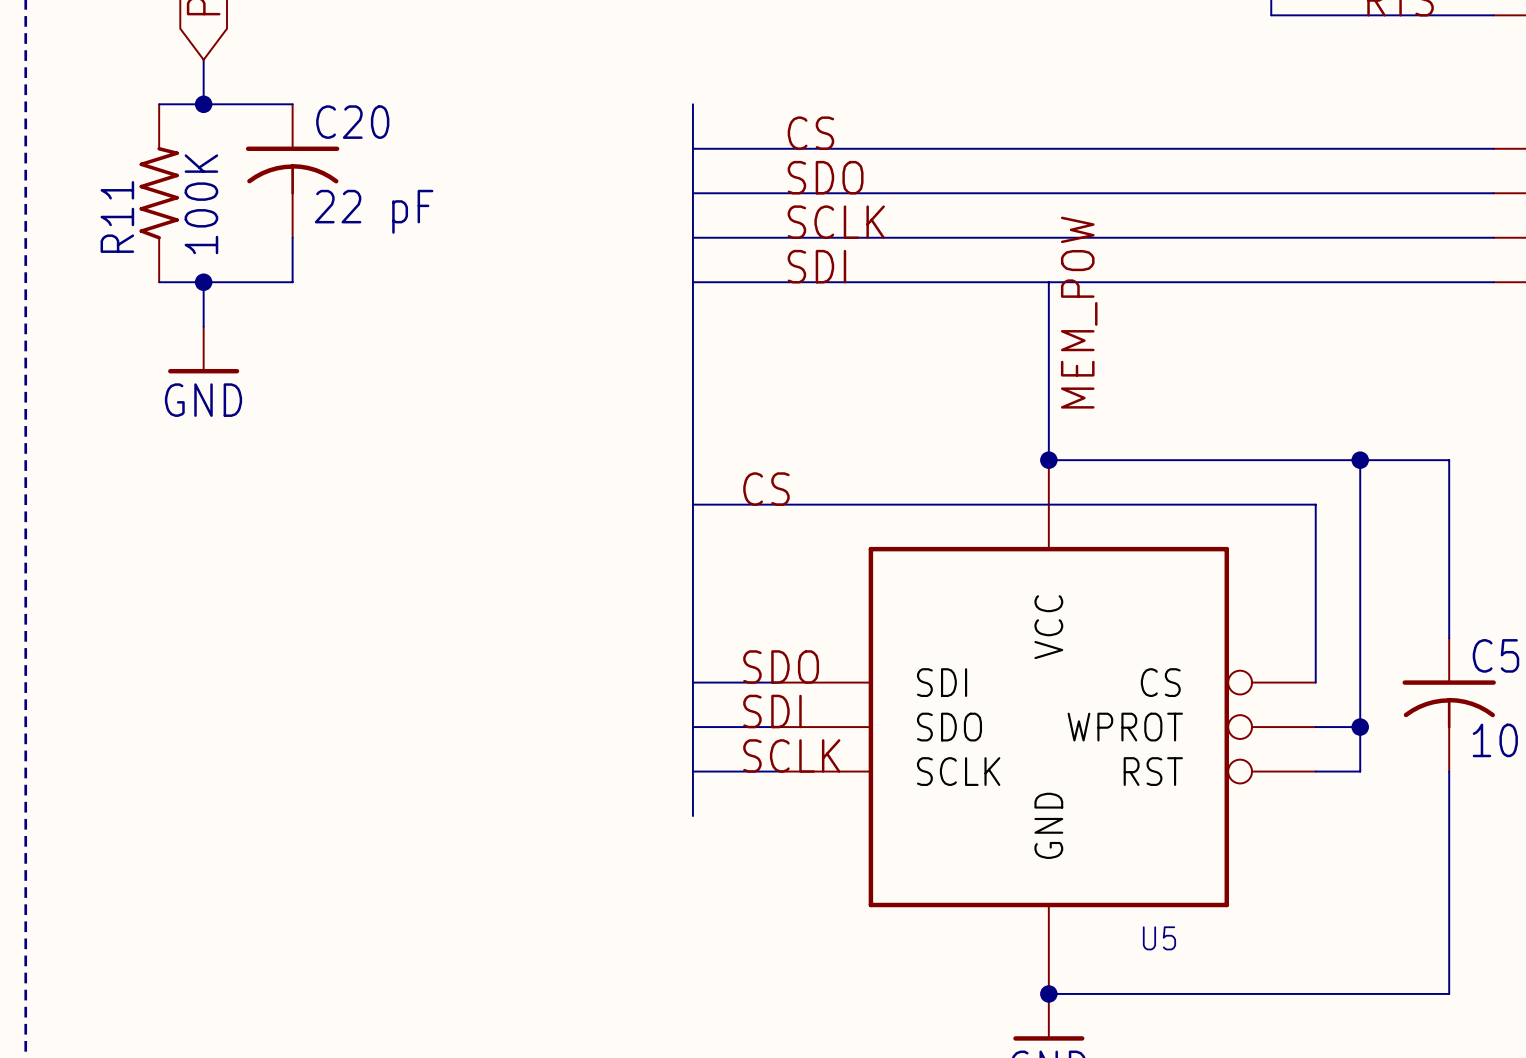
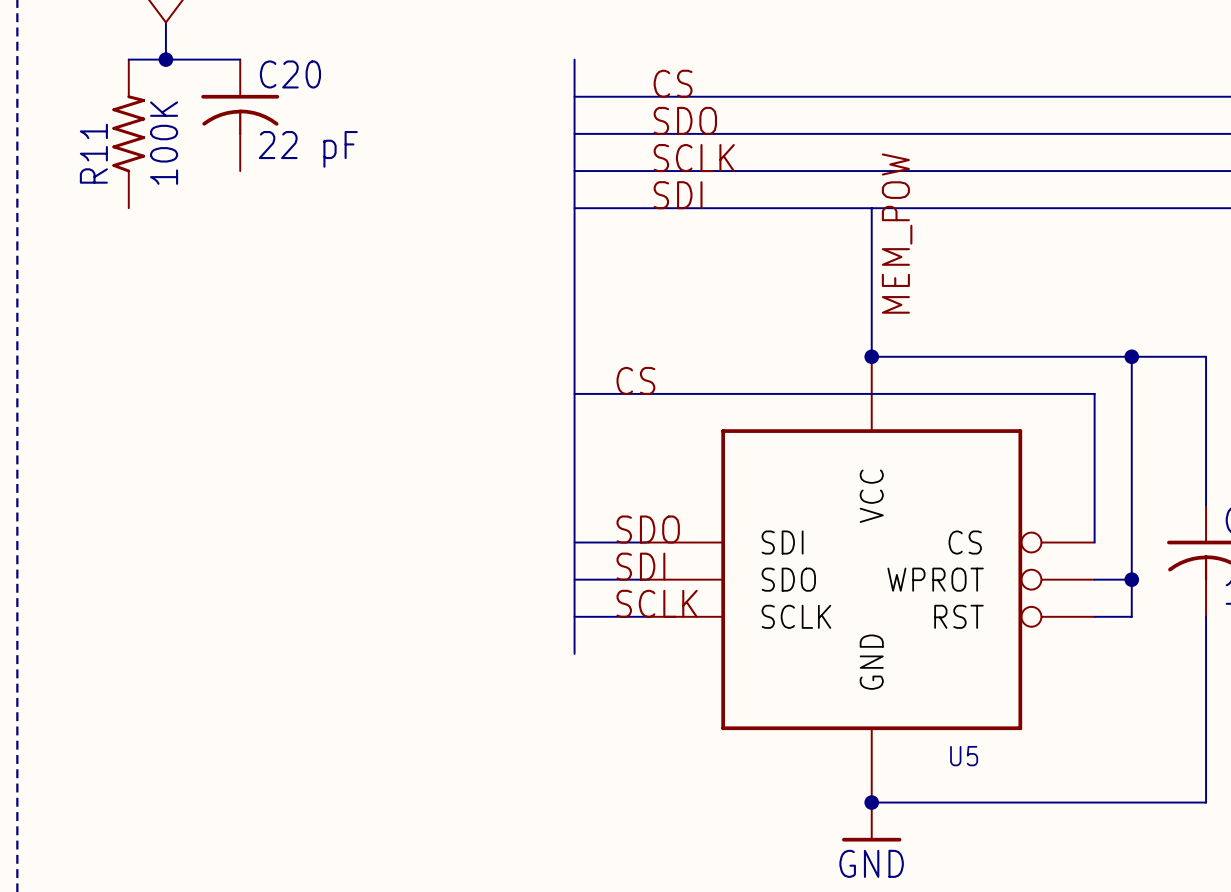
wire: (292, 237) (292, 282) (159, 282) -> none
wire: (203, 282) (203, 326) -> none
junction: (203, 282) -> none
power symbol: GND (203, 350) -> none

